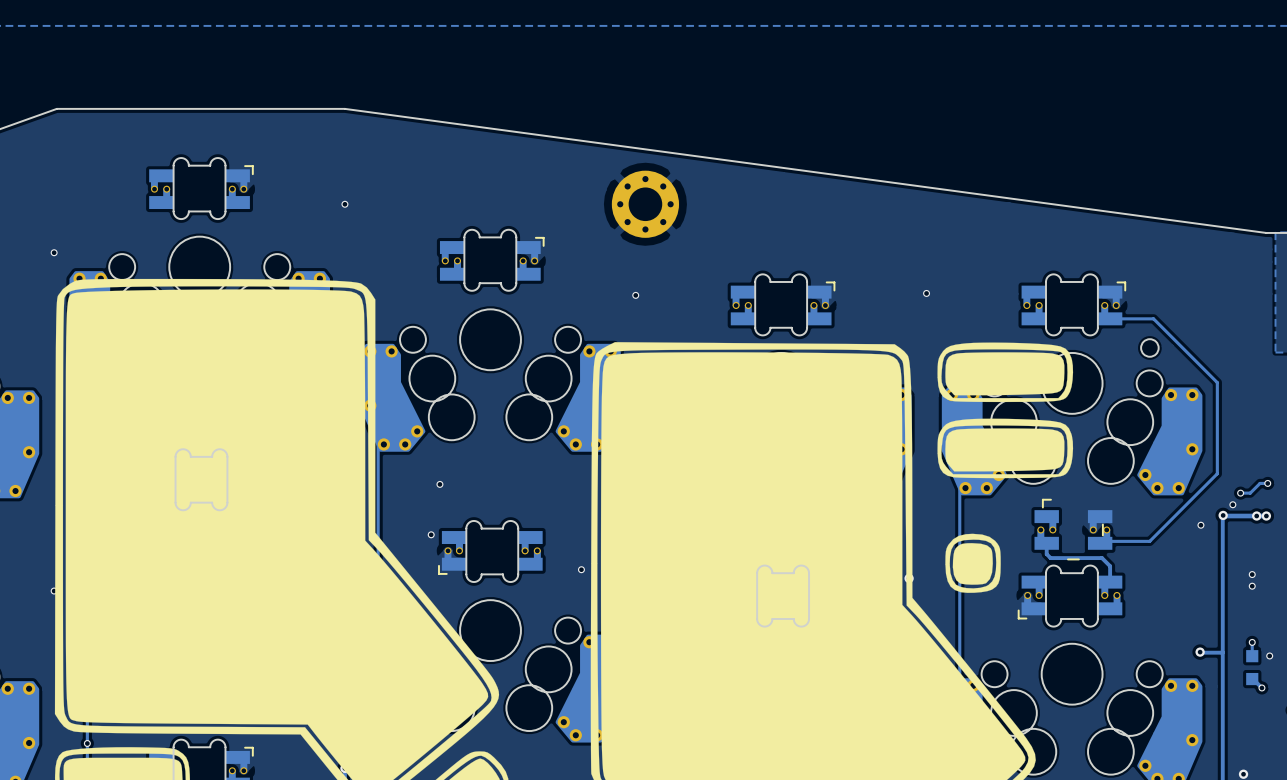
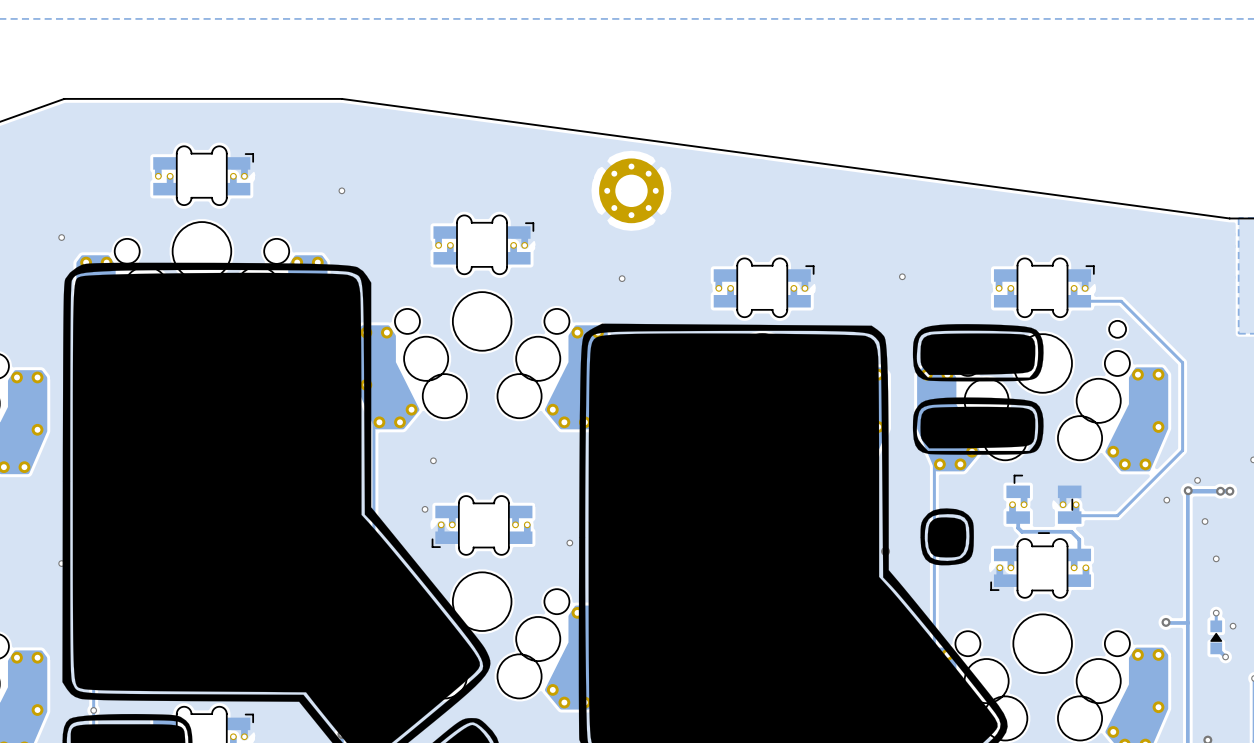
track: (1267, 483) (1260, 483) (1250, 493) (1240, 493) -> none
via: (1267, 483) -> none
via: (1240, 493) -> none
via: none -> (1205, 521)
via: (1252, 574) -> none
part footprint: [1246, 650, 1259, 686] -> [1210, 620, 1223, 655]

